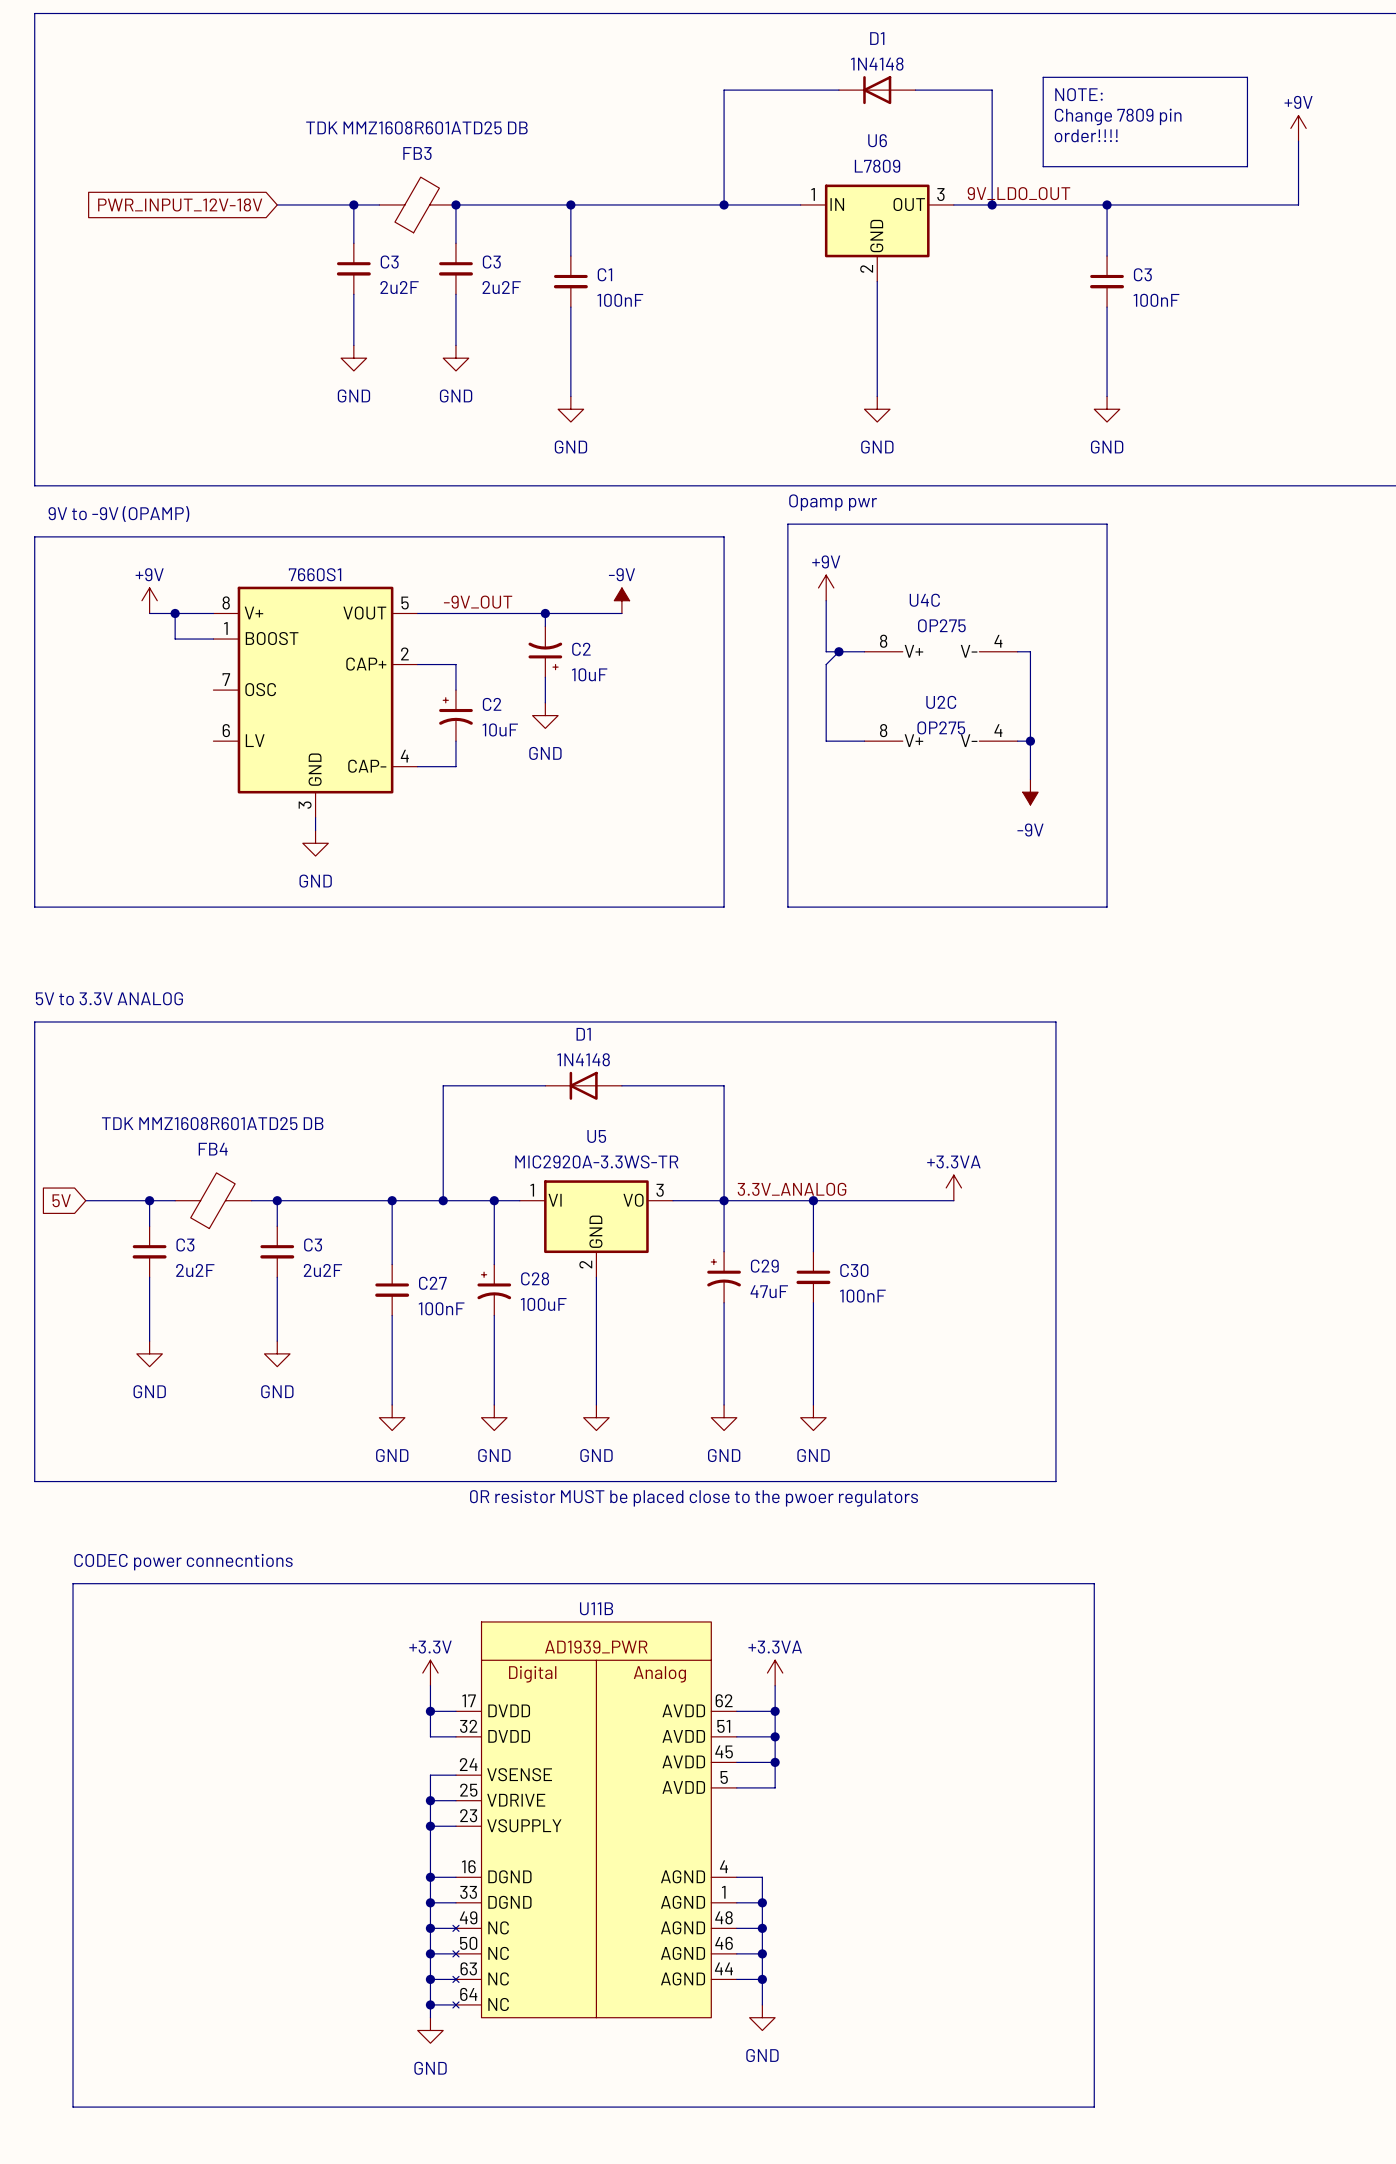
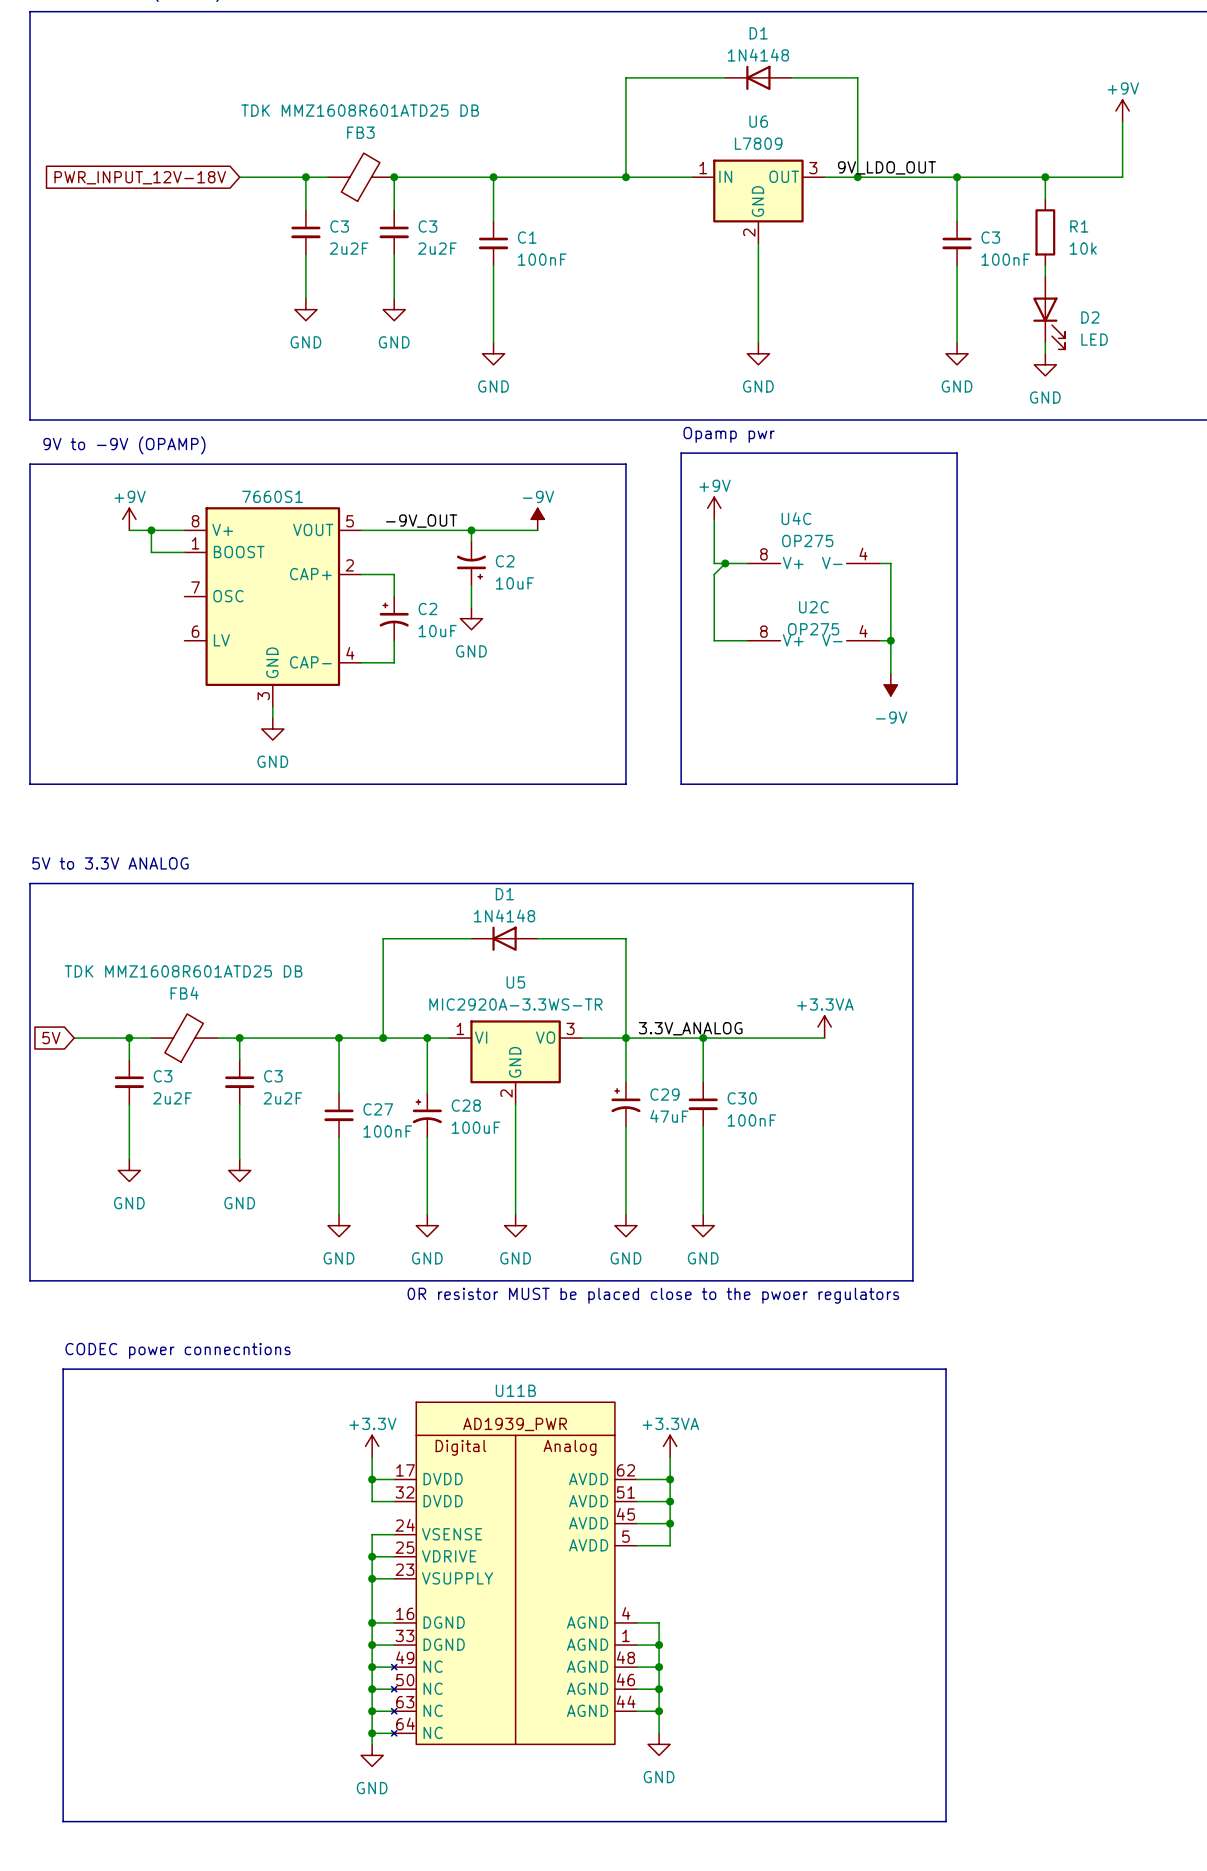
line: (1043, 77) (1247, 77) (1247, 166) (1043, 166) (1043, 77) -> none
text: NOTE: (1078, 94) -> none
text: Change 7809 pin (1118, 116) -> none
text: order!!!! (1086, 135) -> none
wire: none -> (1045, 177) (1045, 199)
junction: none -> (1045, 177)
R1: none -> 10k (1045, 232)
wire: none -> (1045, 265) (1045, 276)
D2: none -> LED (1049, 312)
wire: none -> (1045, 342) (1045, 353)
power symbol: none -> GND (1045, 364)

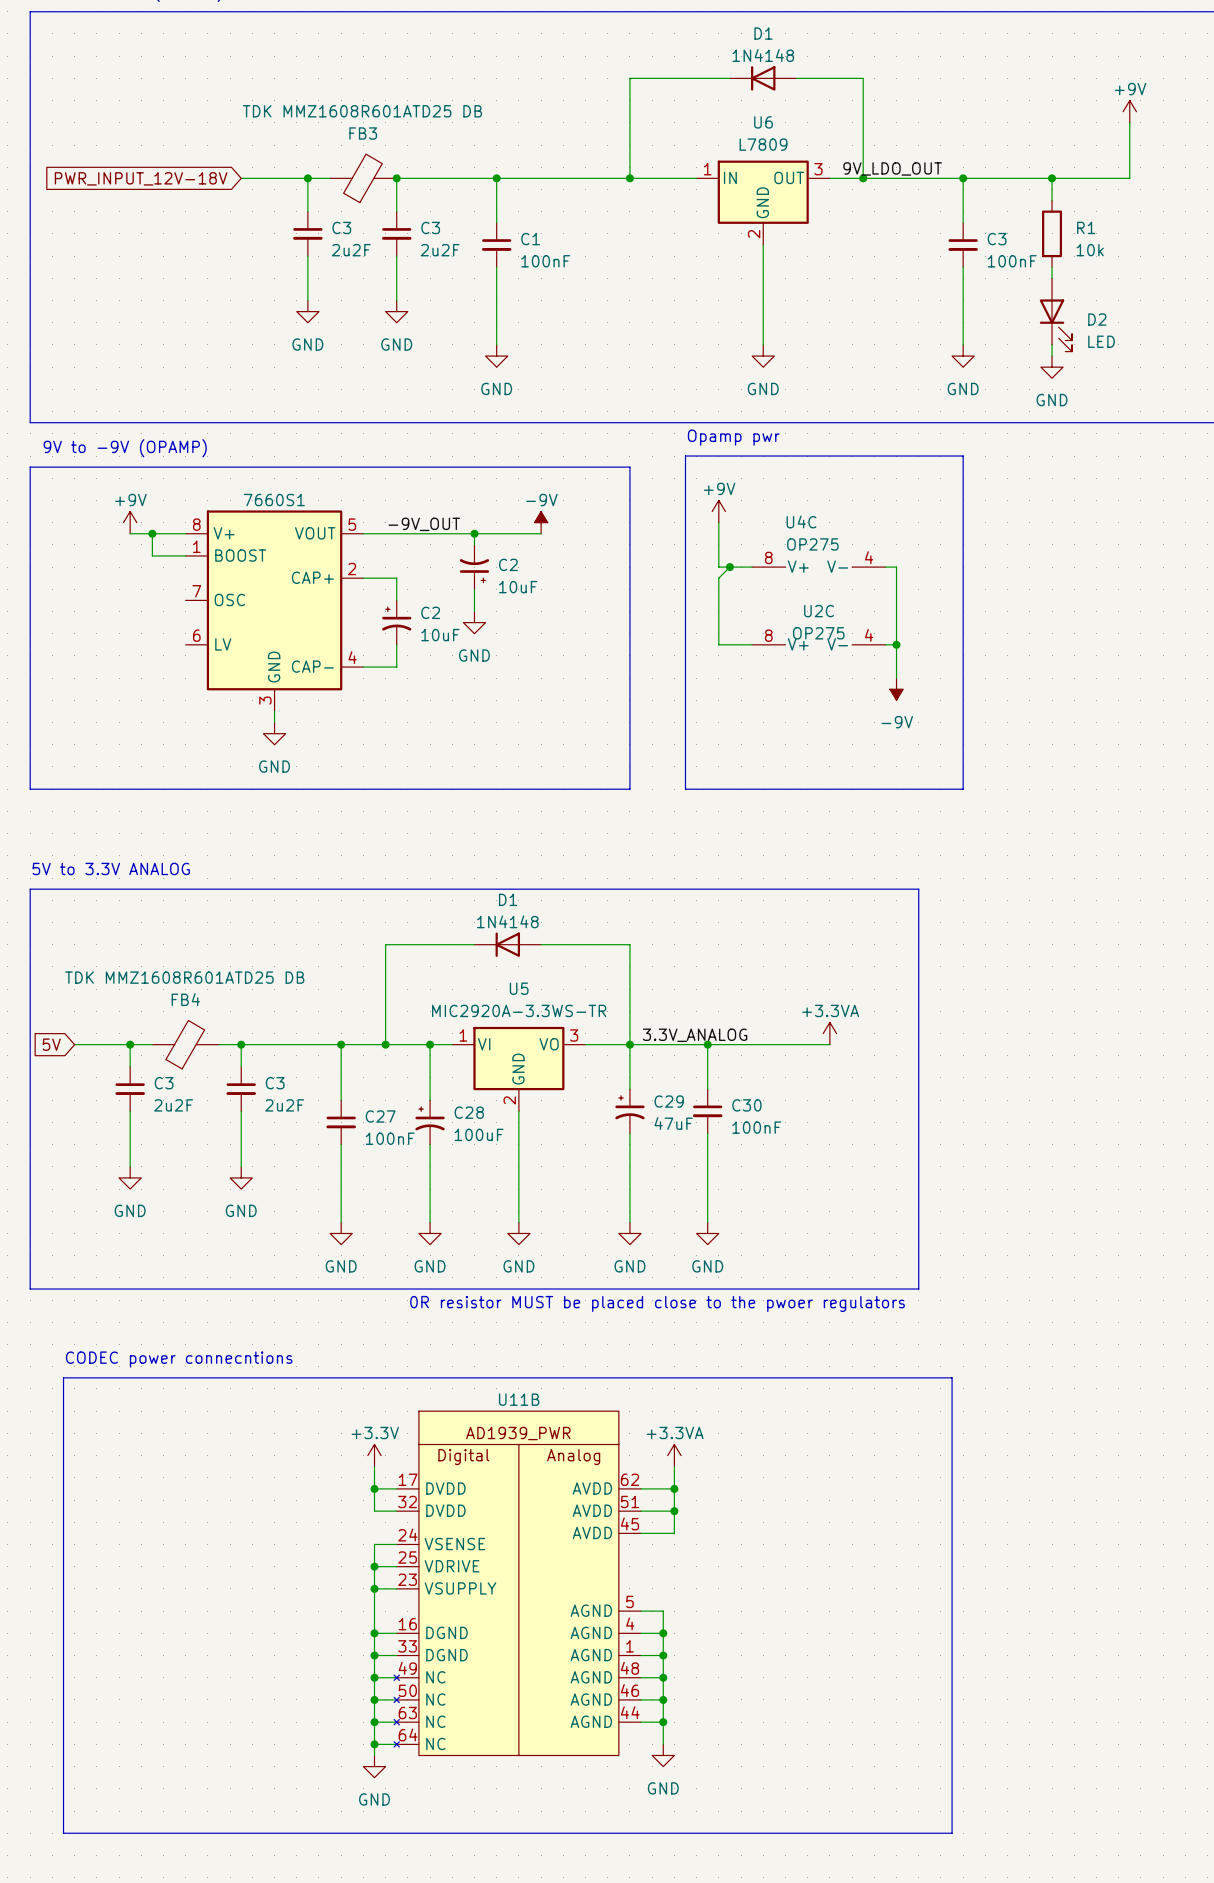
U11B symbol: [391, 1402, 638, 1745] -> [394, 1411, 642, 1756]
wire: (670, 1523) (670, 1545) (637, 1545) -> none
junction: (670, 1523) -> none
wire: none -> (641, 1611) (663, 1611) (663, 1633)
junction: none -> (663, 1633)

